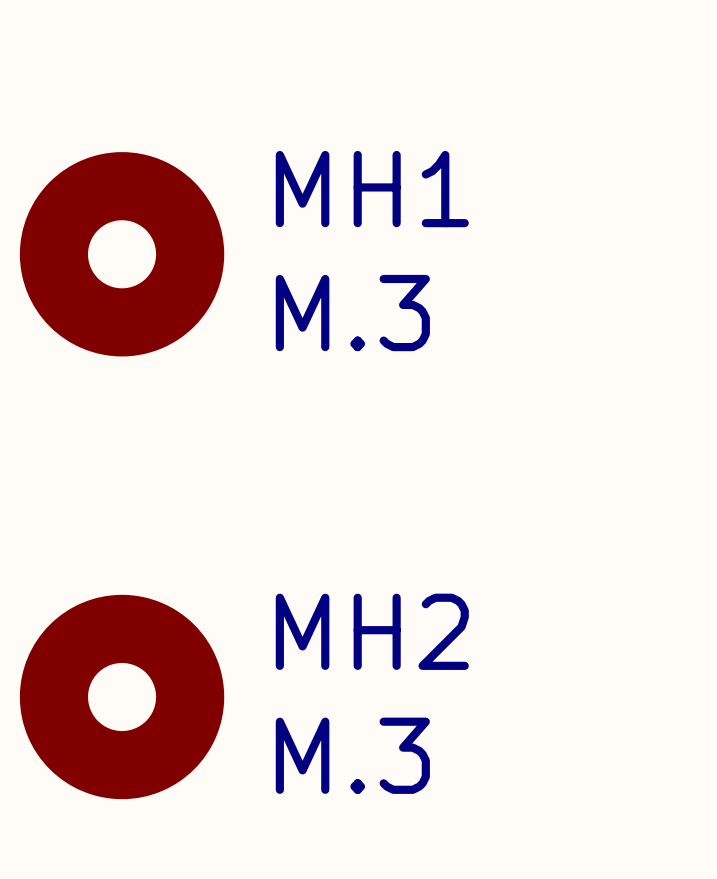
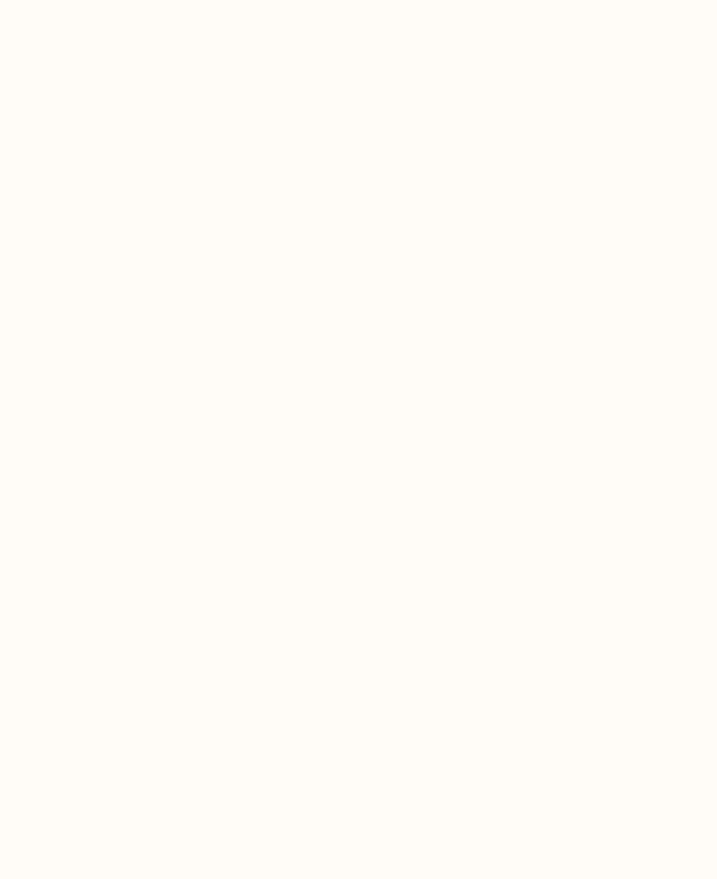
MH1: M.3 (122, 254) -> none
MH2: M.3 (122, 697) -> none

